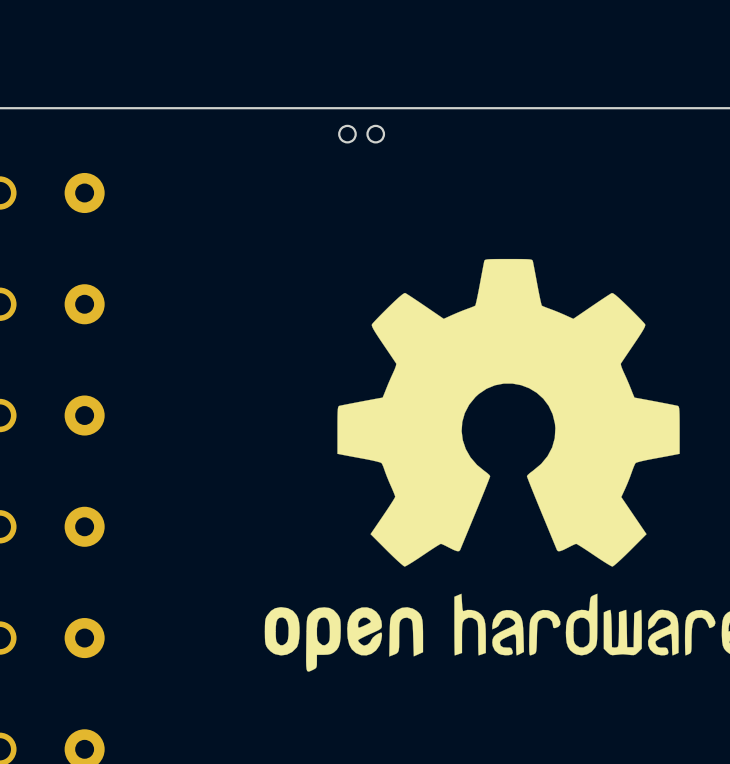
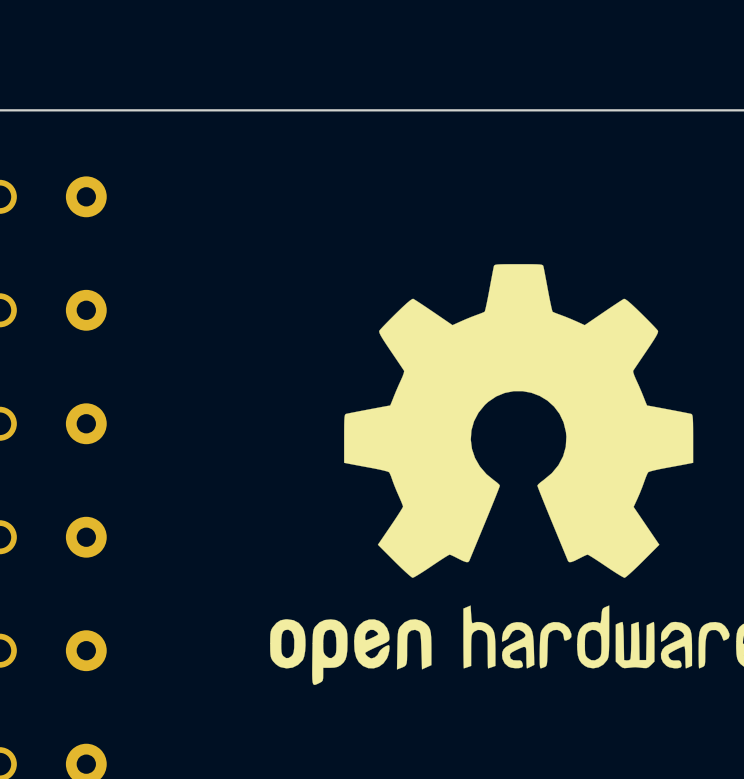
round board edge: [338, 124, 357, 144] -> none
round board edge: [366, 124, 386, 144] -> none

